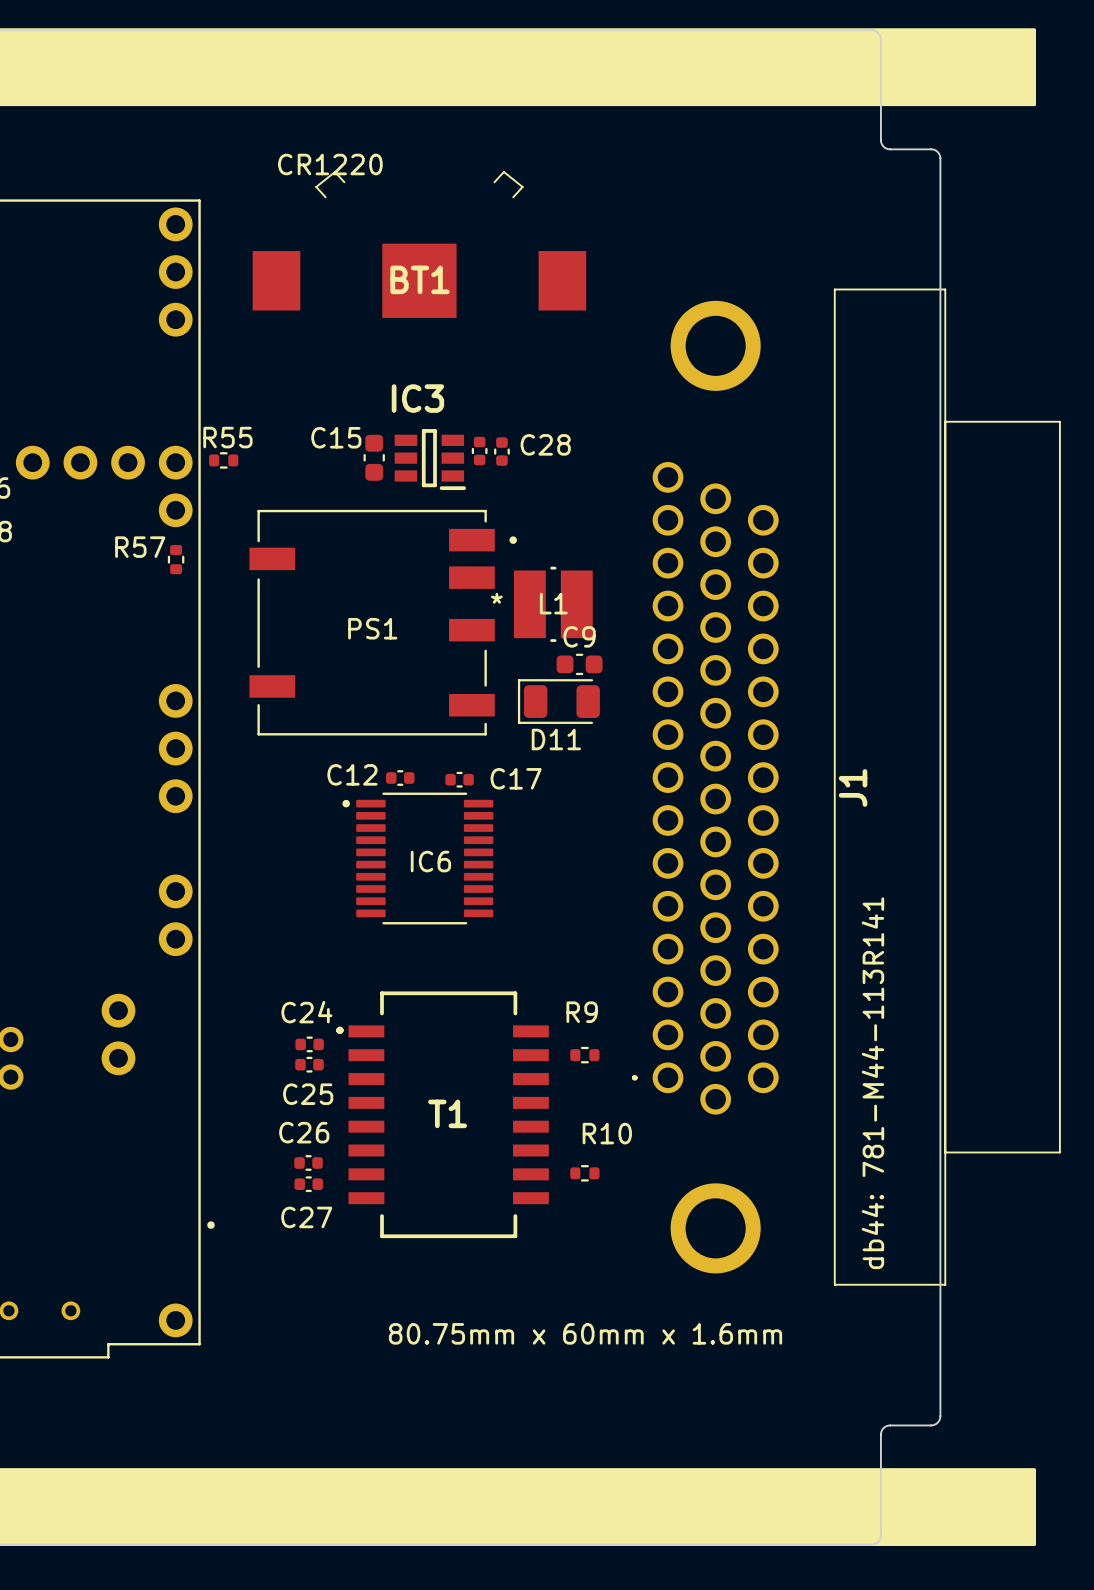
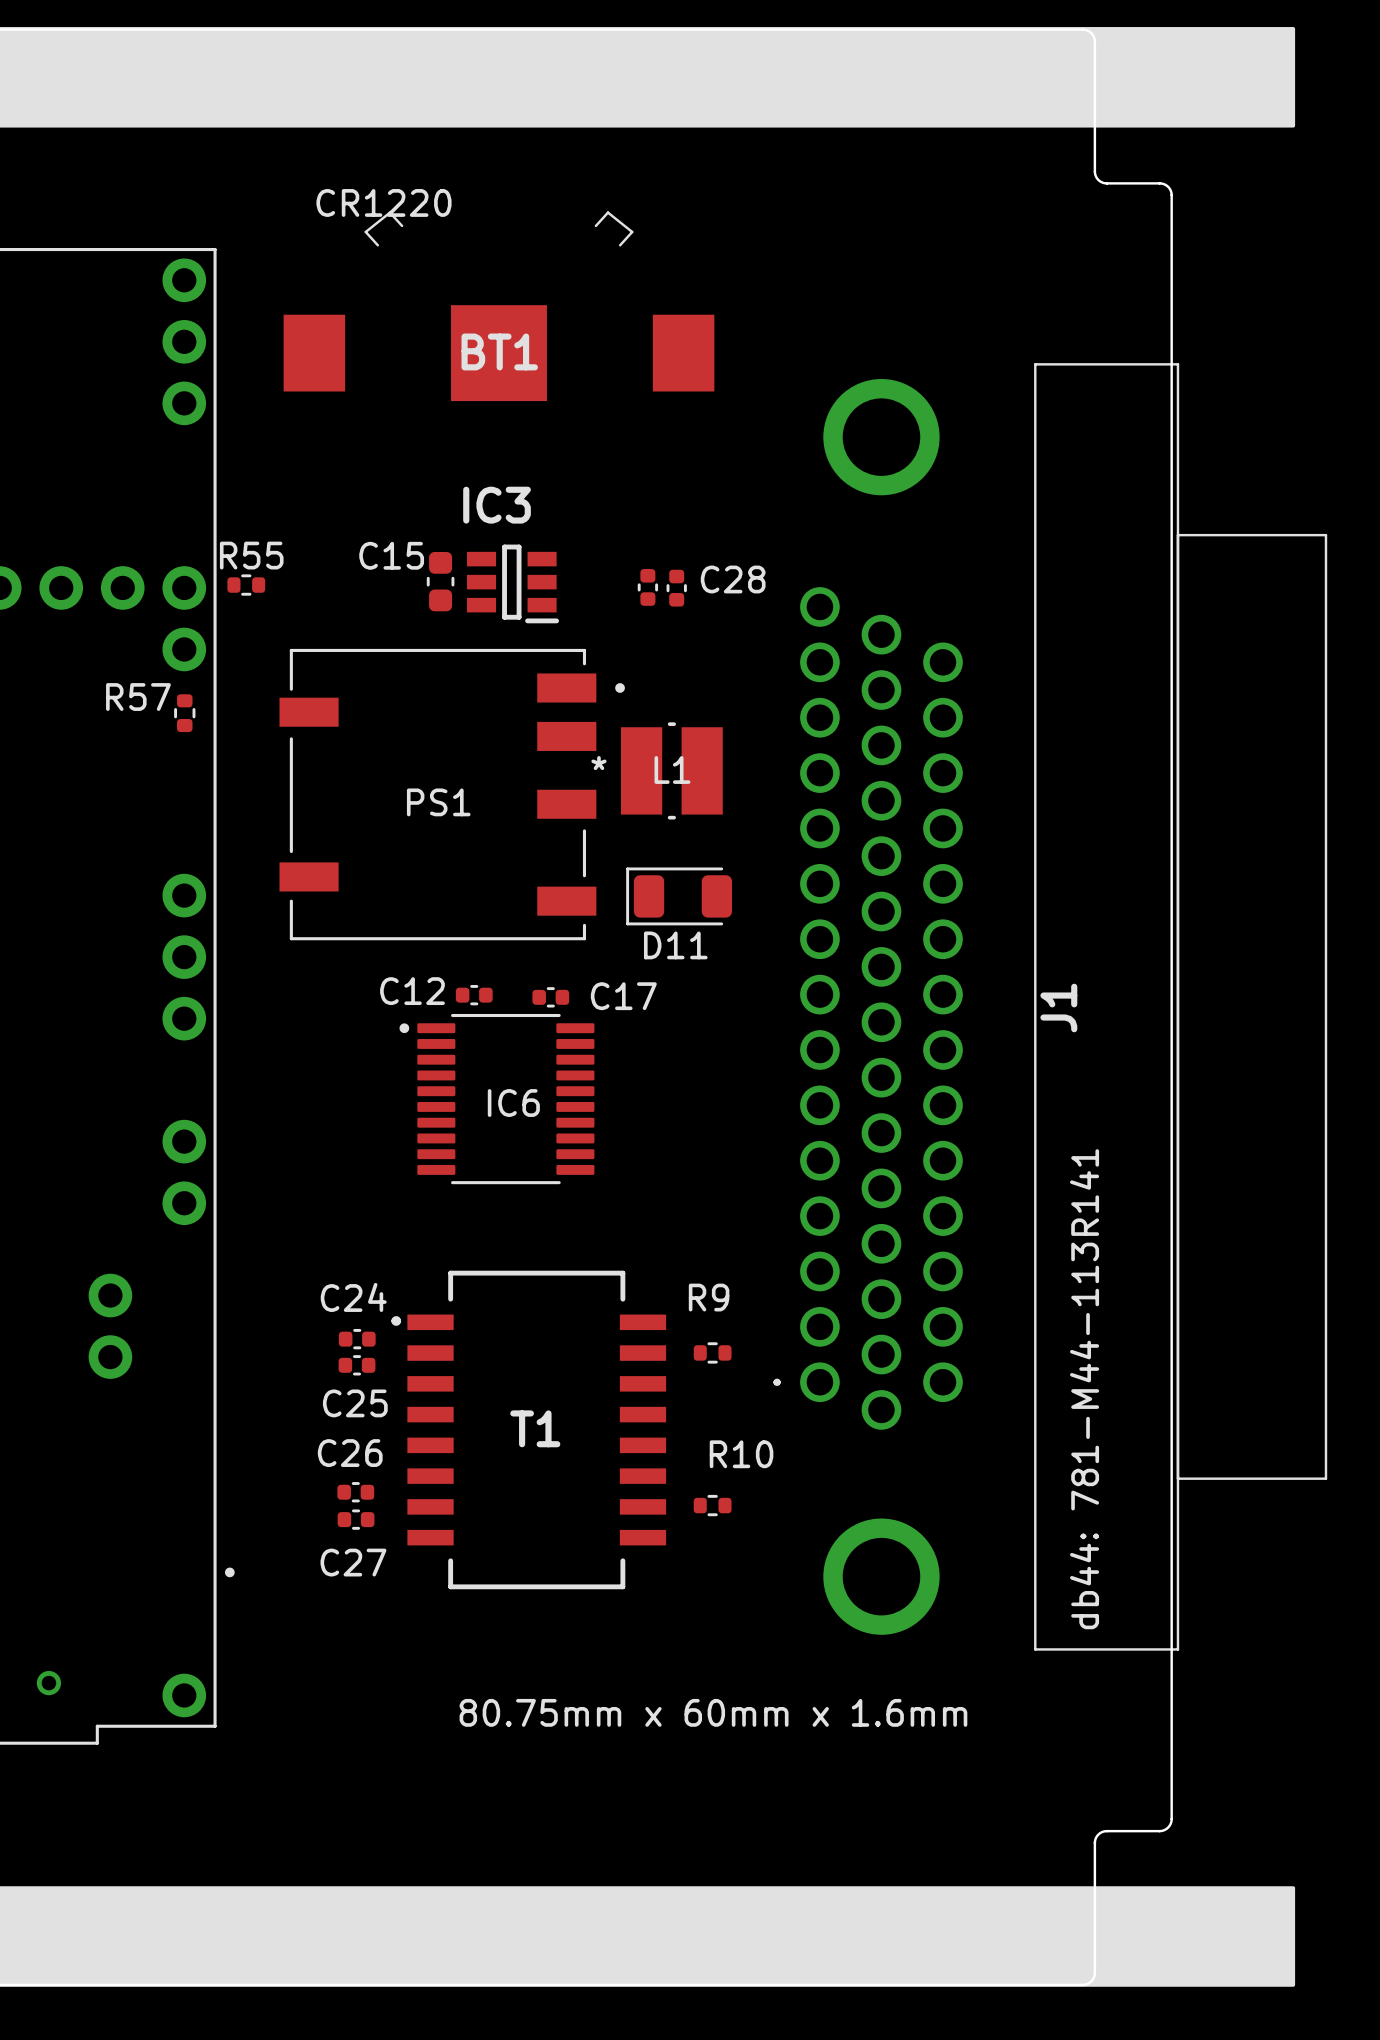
part position: (479, 451) -> (647, 587)
C28 position: (501, 451) -> (676, 588)
C9: (579, 664) -> none

